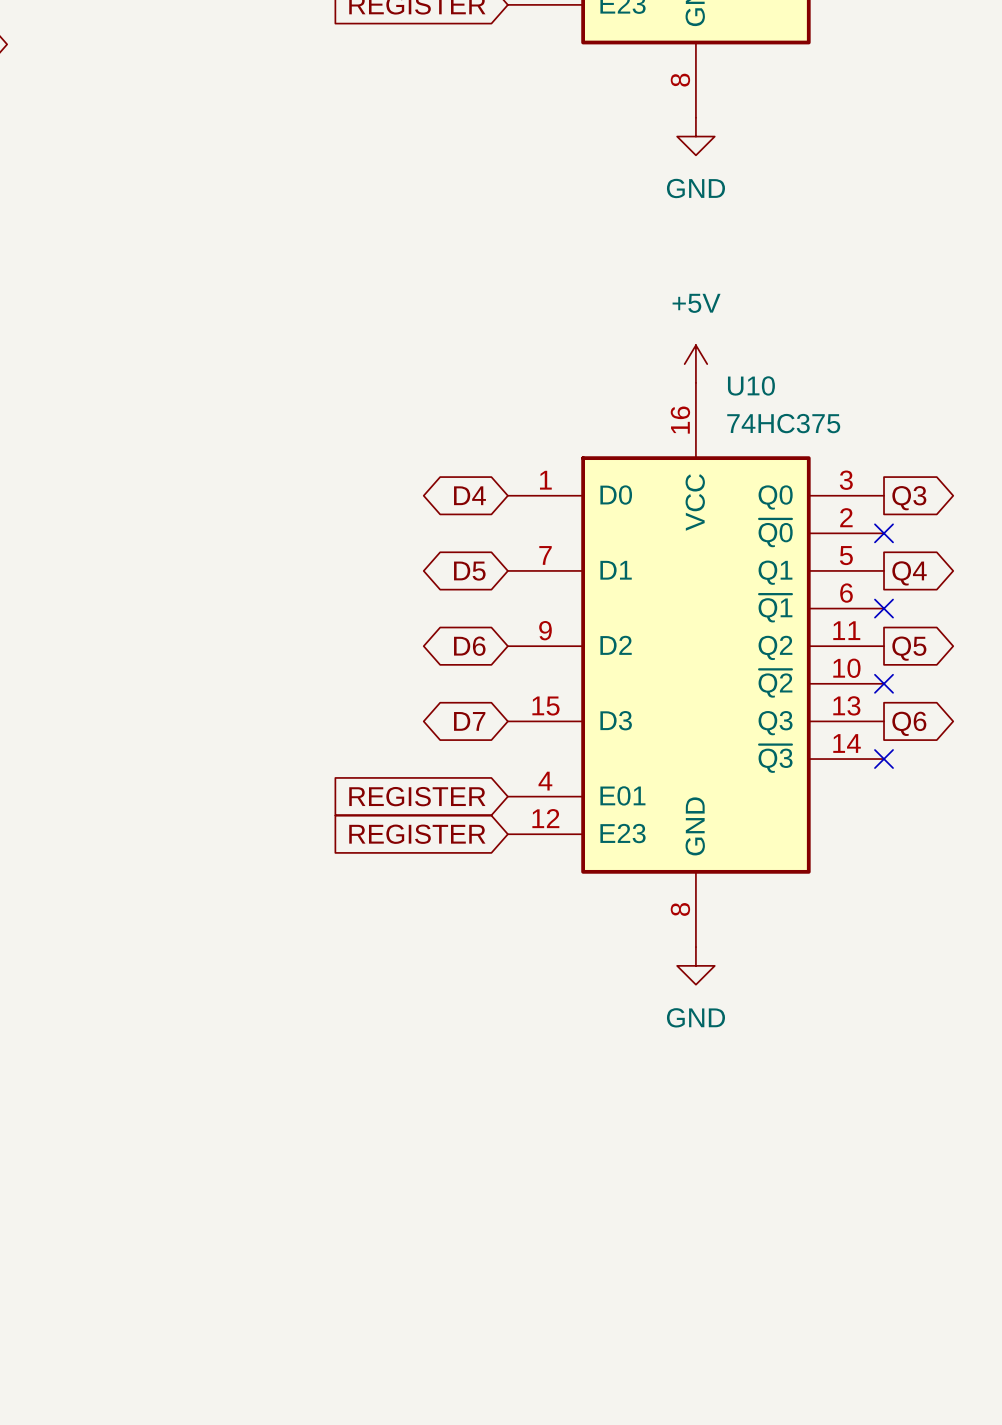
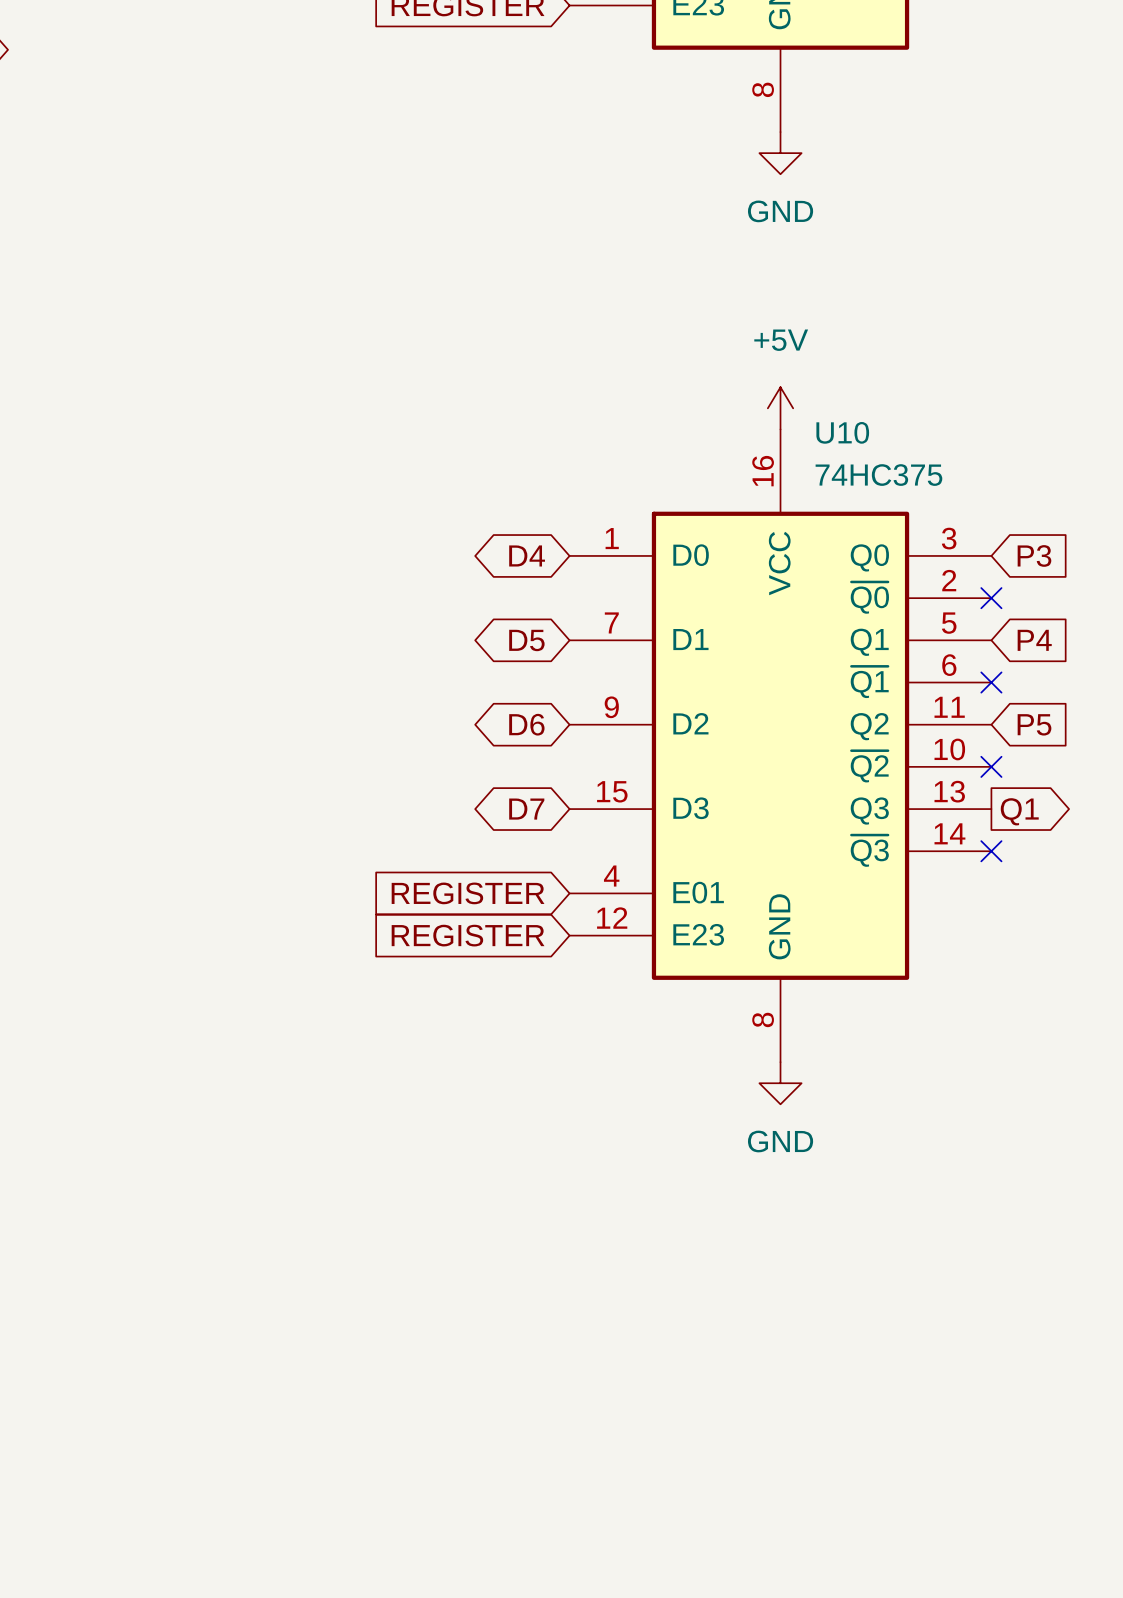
global label shape: output (909, 498) -> input (1034, 555)
global label: Q3 (909, 498) -> P3 (1034, 555)
global label shape: output (909, 573) -> input (1034, 640)
global label: Q4 (909, 573) -> P4 (1034, 640)
global label shape: output (909, 648) -> input (1034, 724)
global label: Q5 (909, 648) -> P5 (1034, 724)
global label: Q6 (909, 723) -> Q1 (1019, 811)

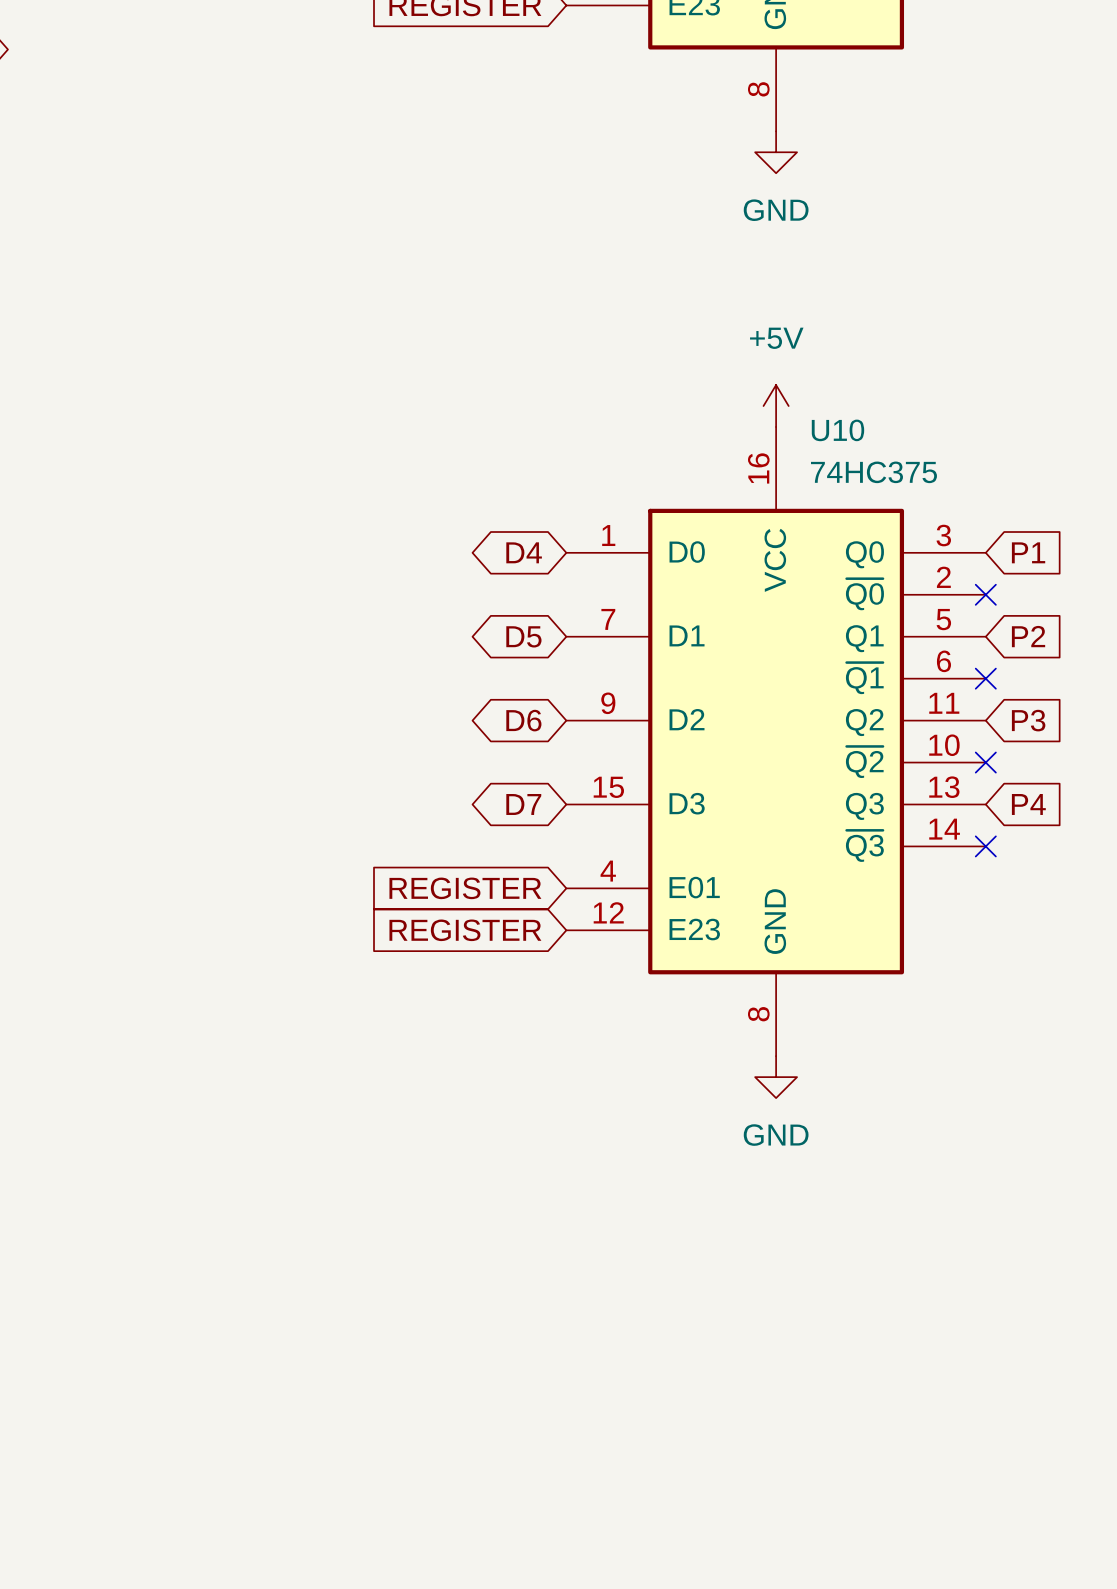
global label: P3 (1034, 555) -> P1 (1028, 552)
global label: P4 (1034, 640) -> P2 (1028, 636)
global label: P5 (1034, 724) -> P3 (1028, 720)
global label shape: output (1019, 811) -> input (1028, 804)
global label: Q1 (1019, 811) -> P4 (1028, 804)

